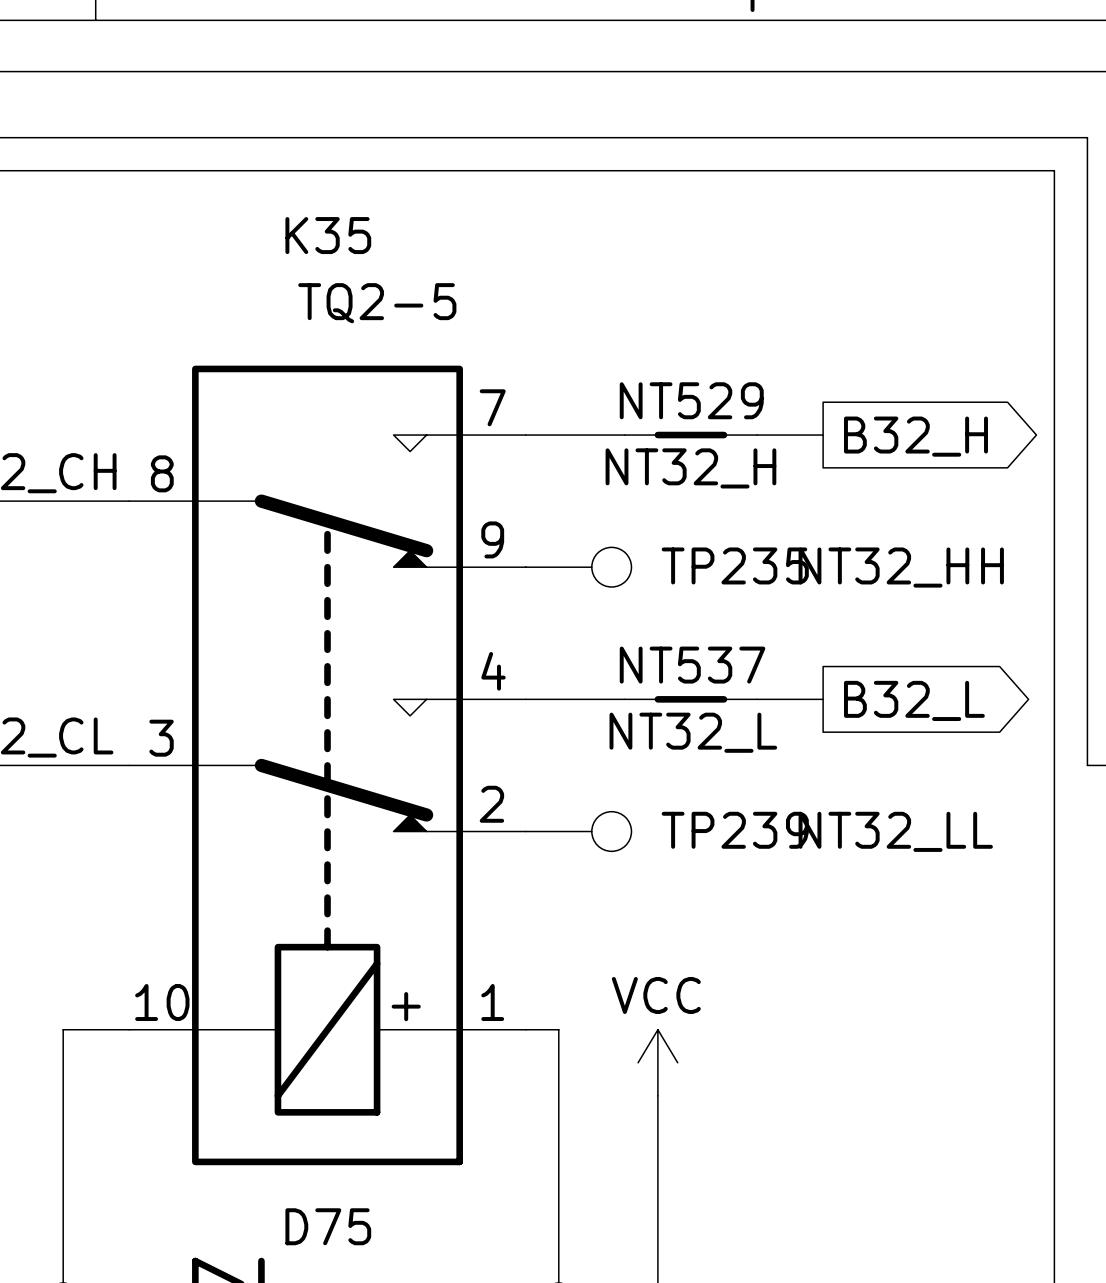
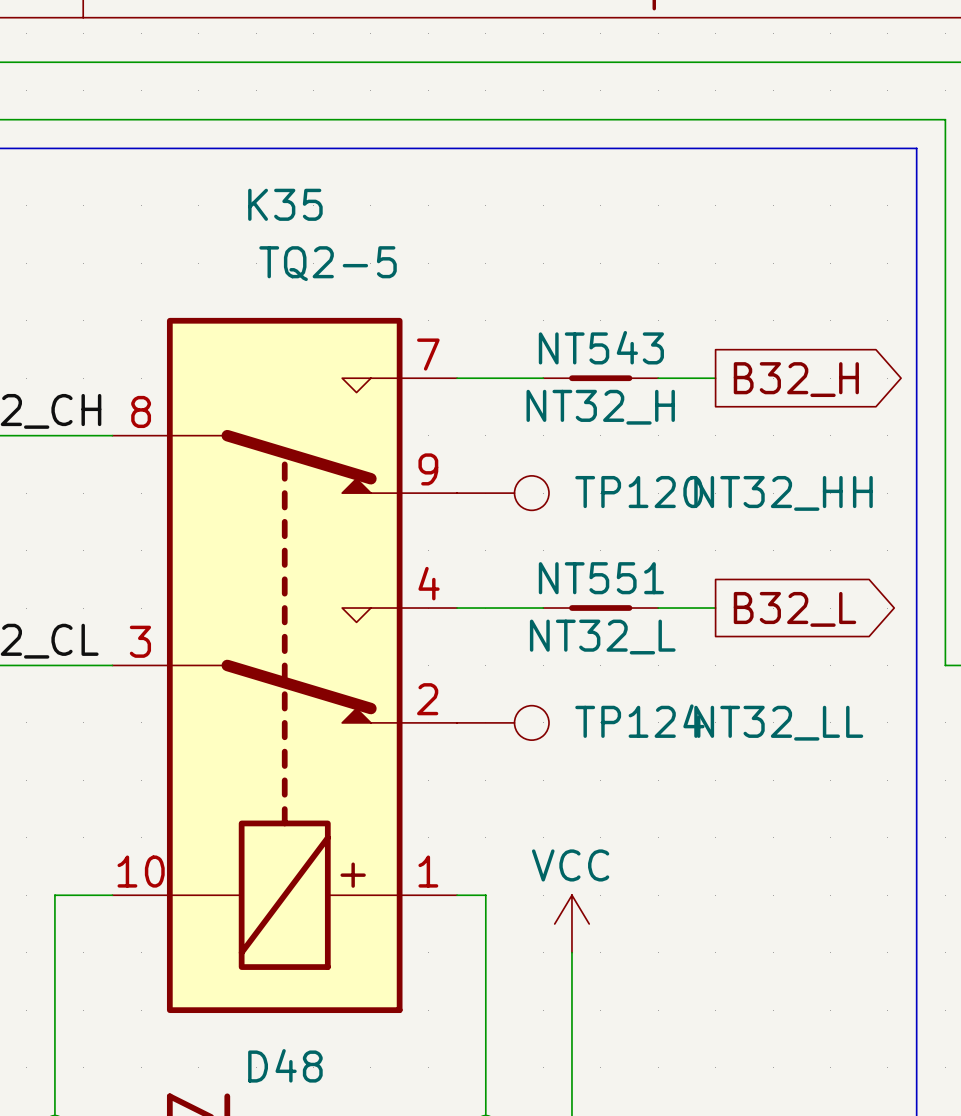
NT529 name: NT529 (691, 400) -> NT543 (601, 347)
TP235 name: TP235 (735, 565) -> TP120 (639, 492)
NT537 name: NT537 (692, 665) -> NT551 (601, 578)
TP239 name: TP239 (735, 830) -> TP124 (639, 721)
D75 name: D75 (328, 1226) -> D48 (285, 1065)

